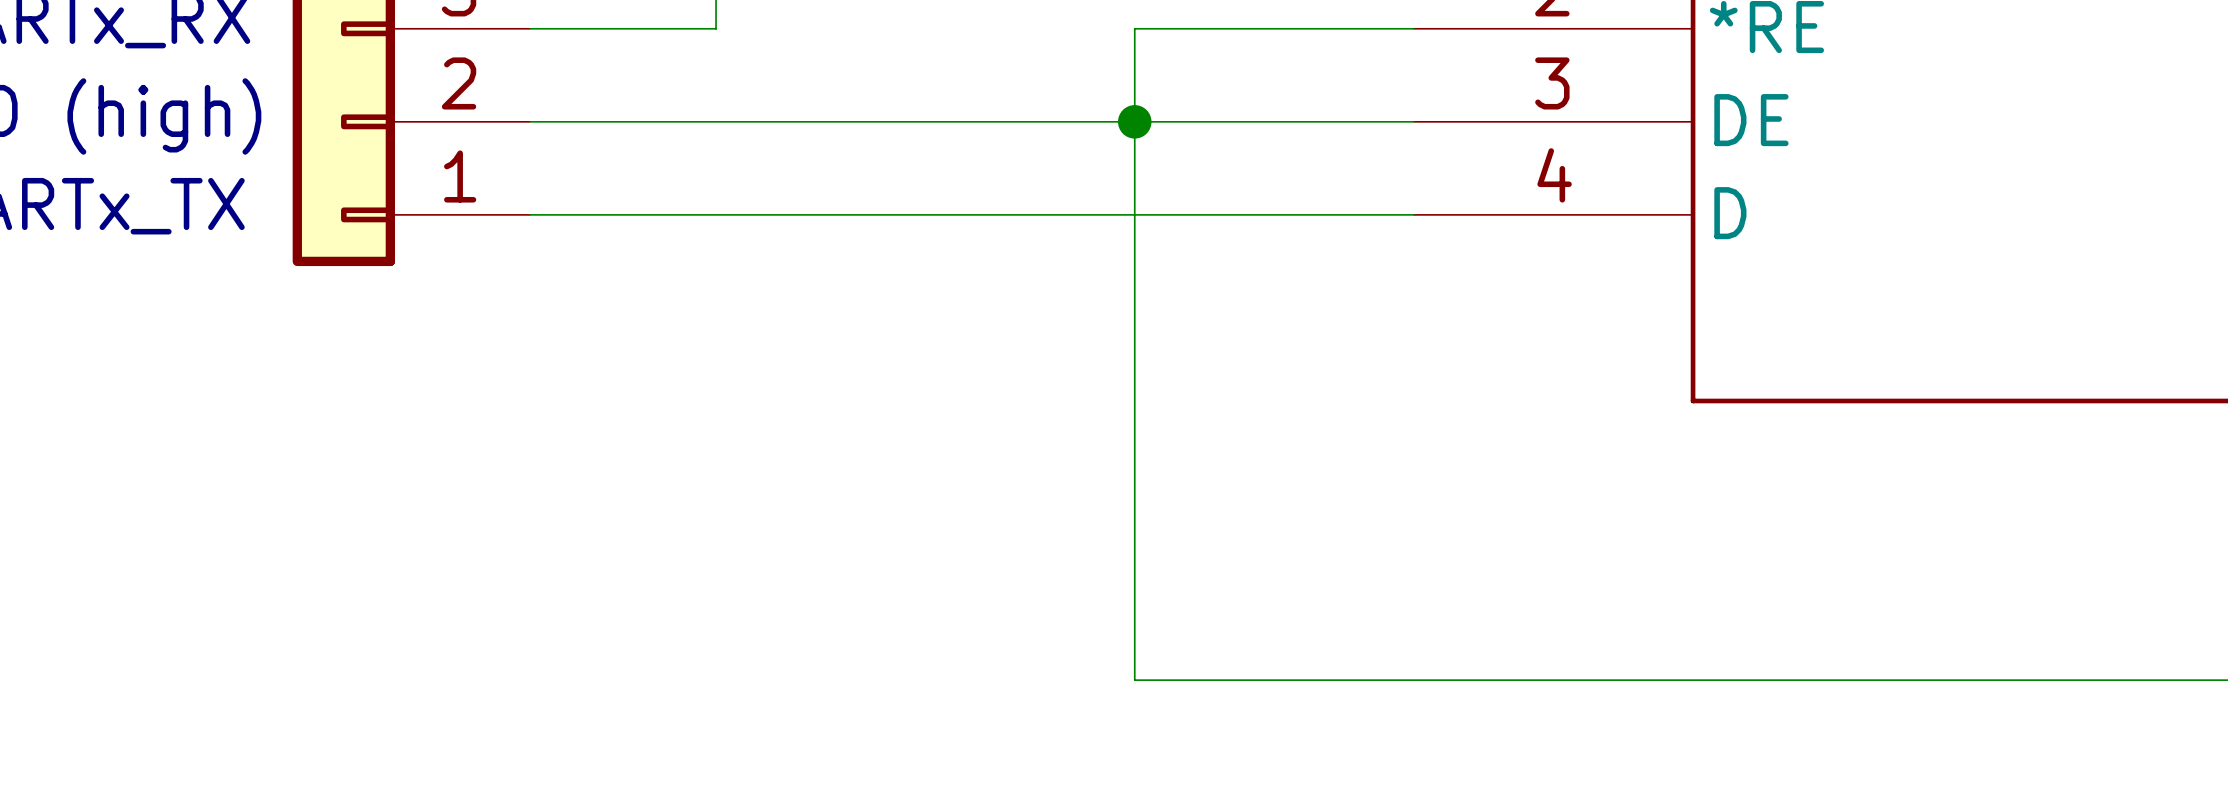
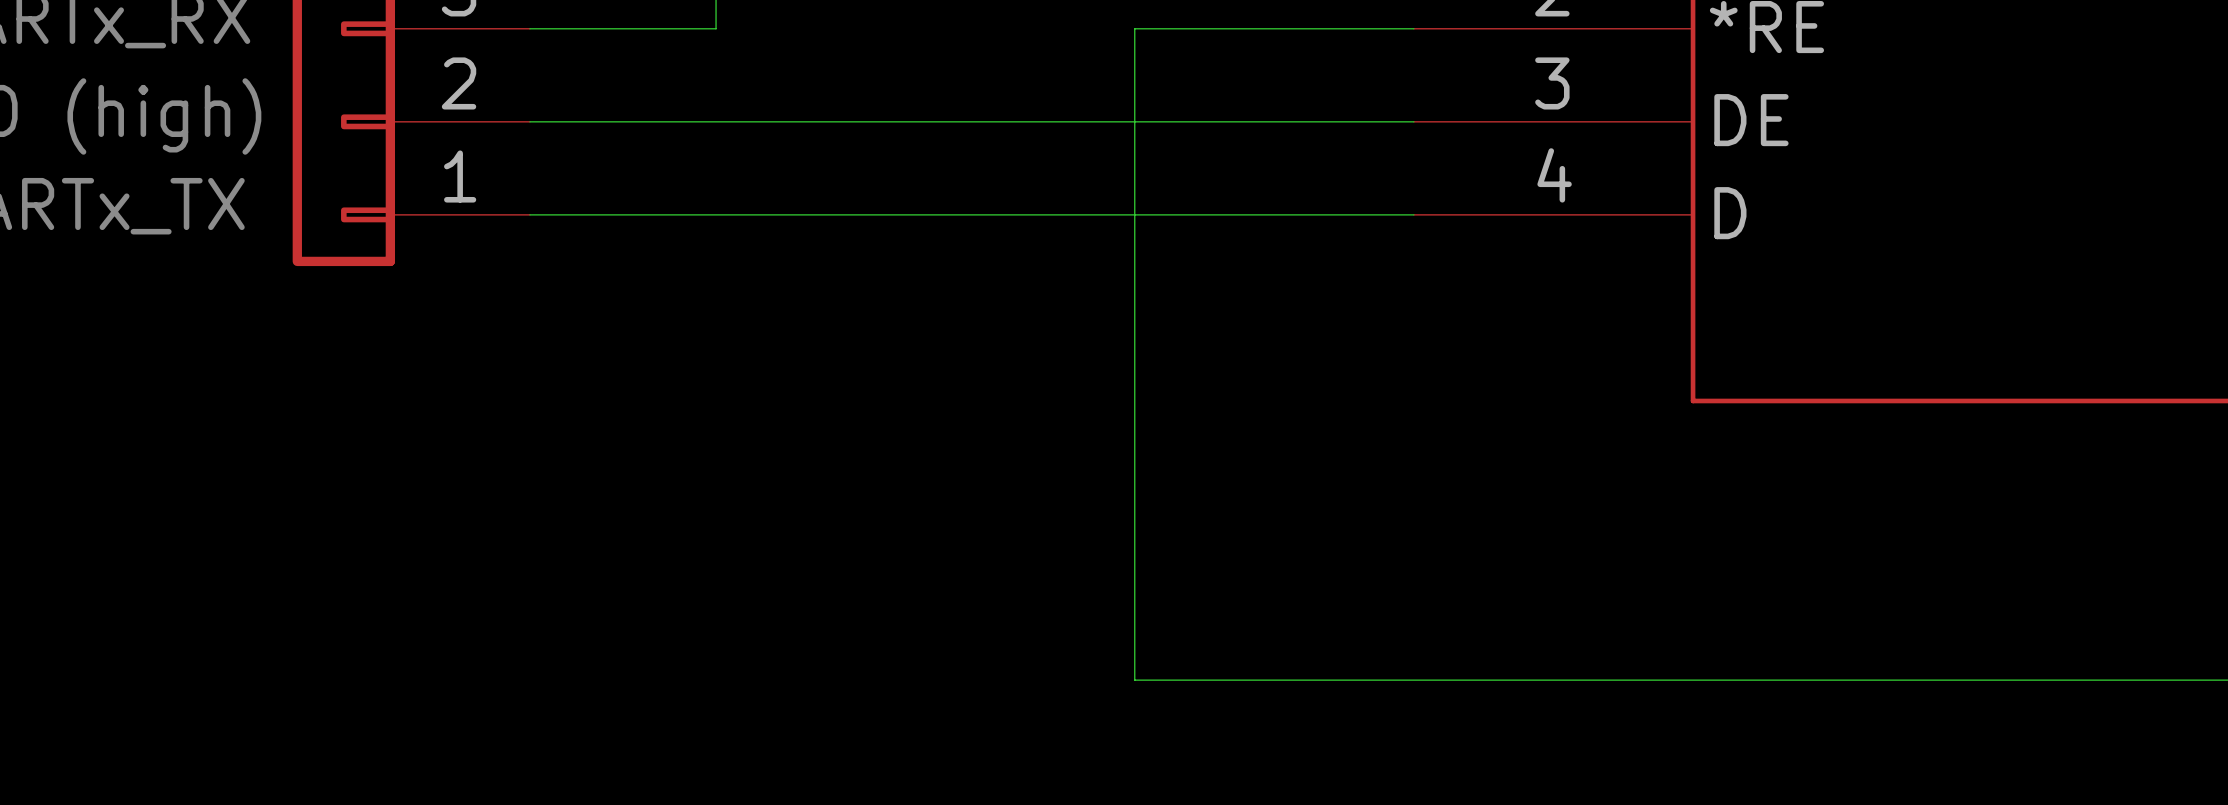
junction: (1134, 121) -> none

